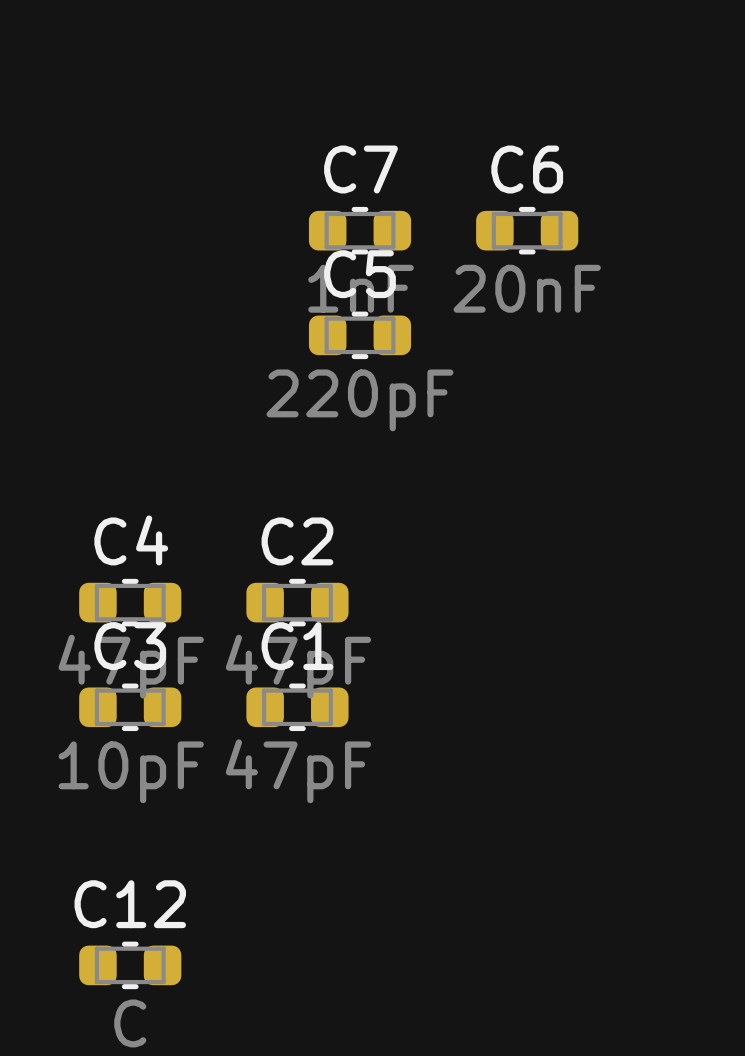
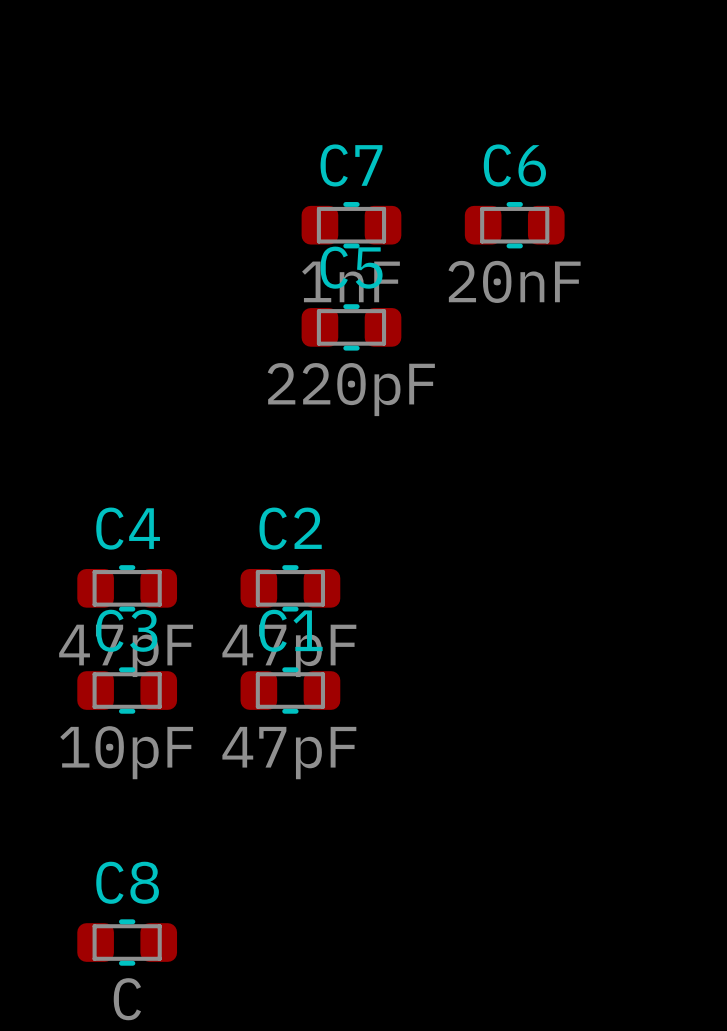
C12 name: C12 (130, 904) -> C8 (127, 882)

